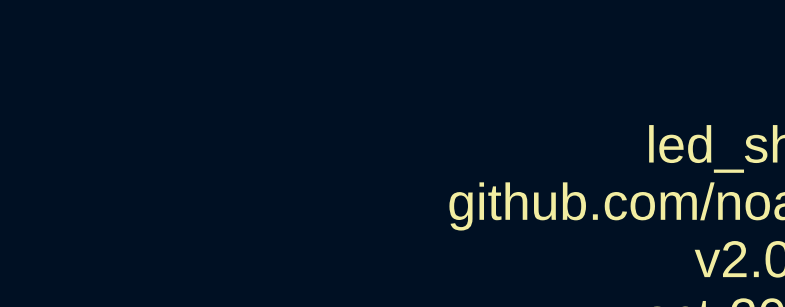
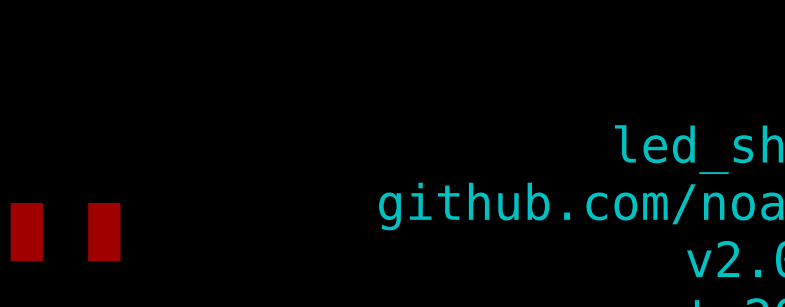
part: none -> (65, 232)

